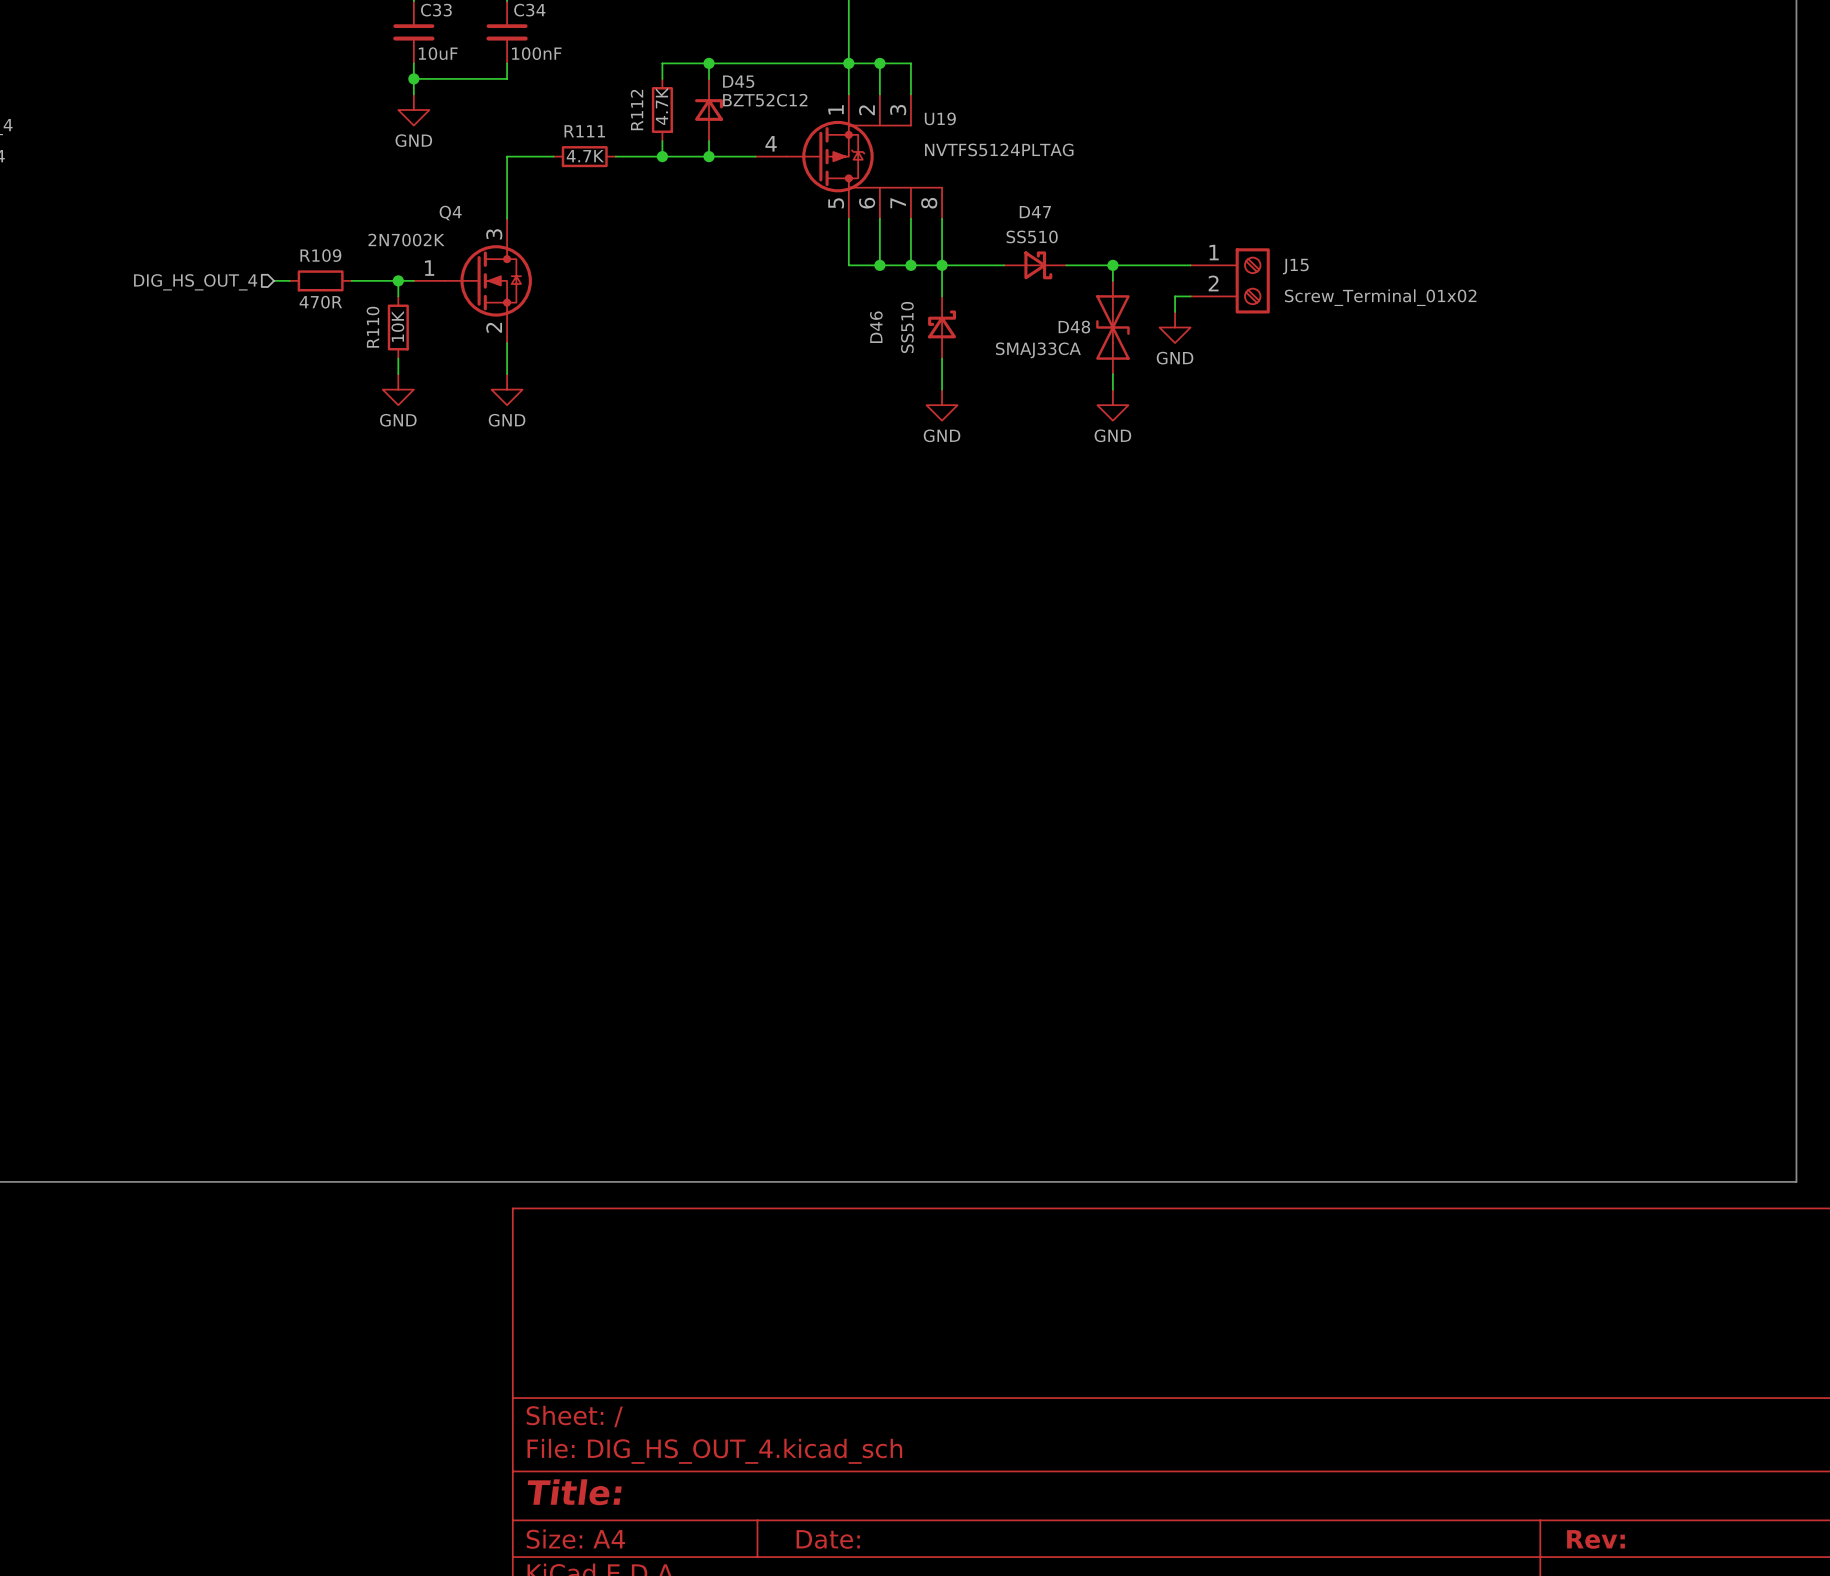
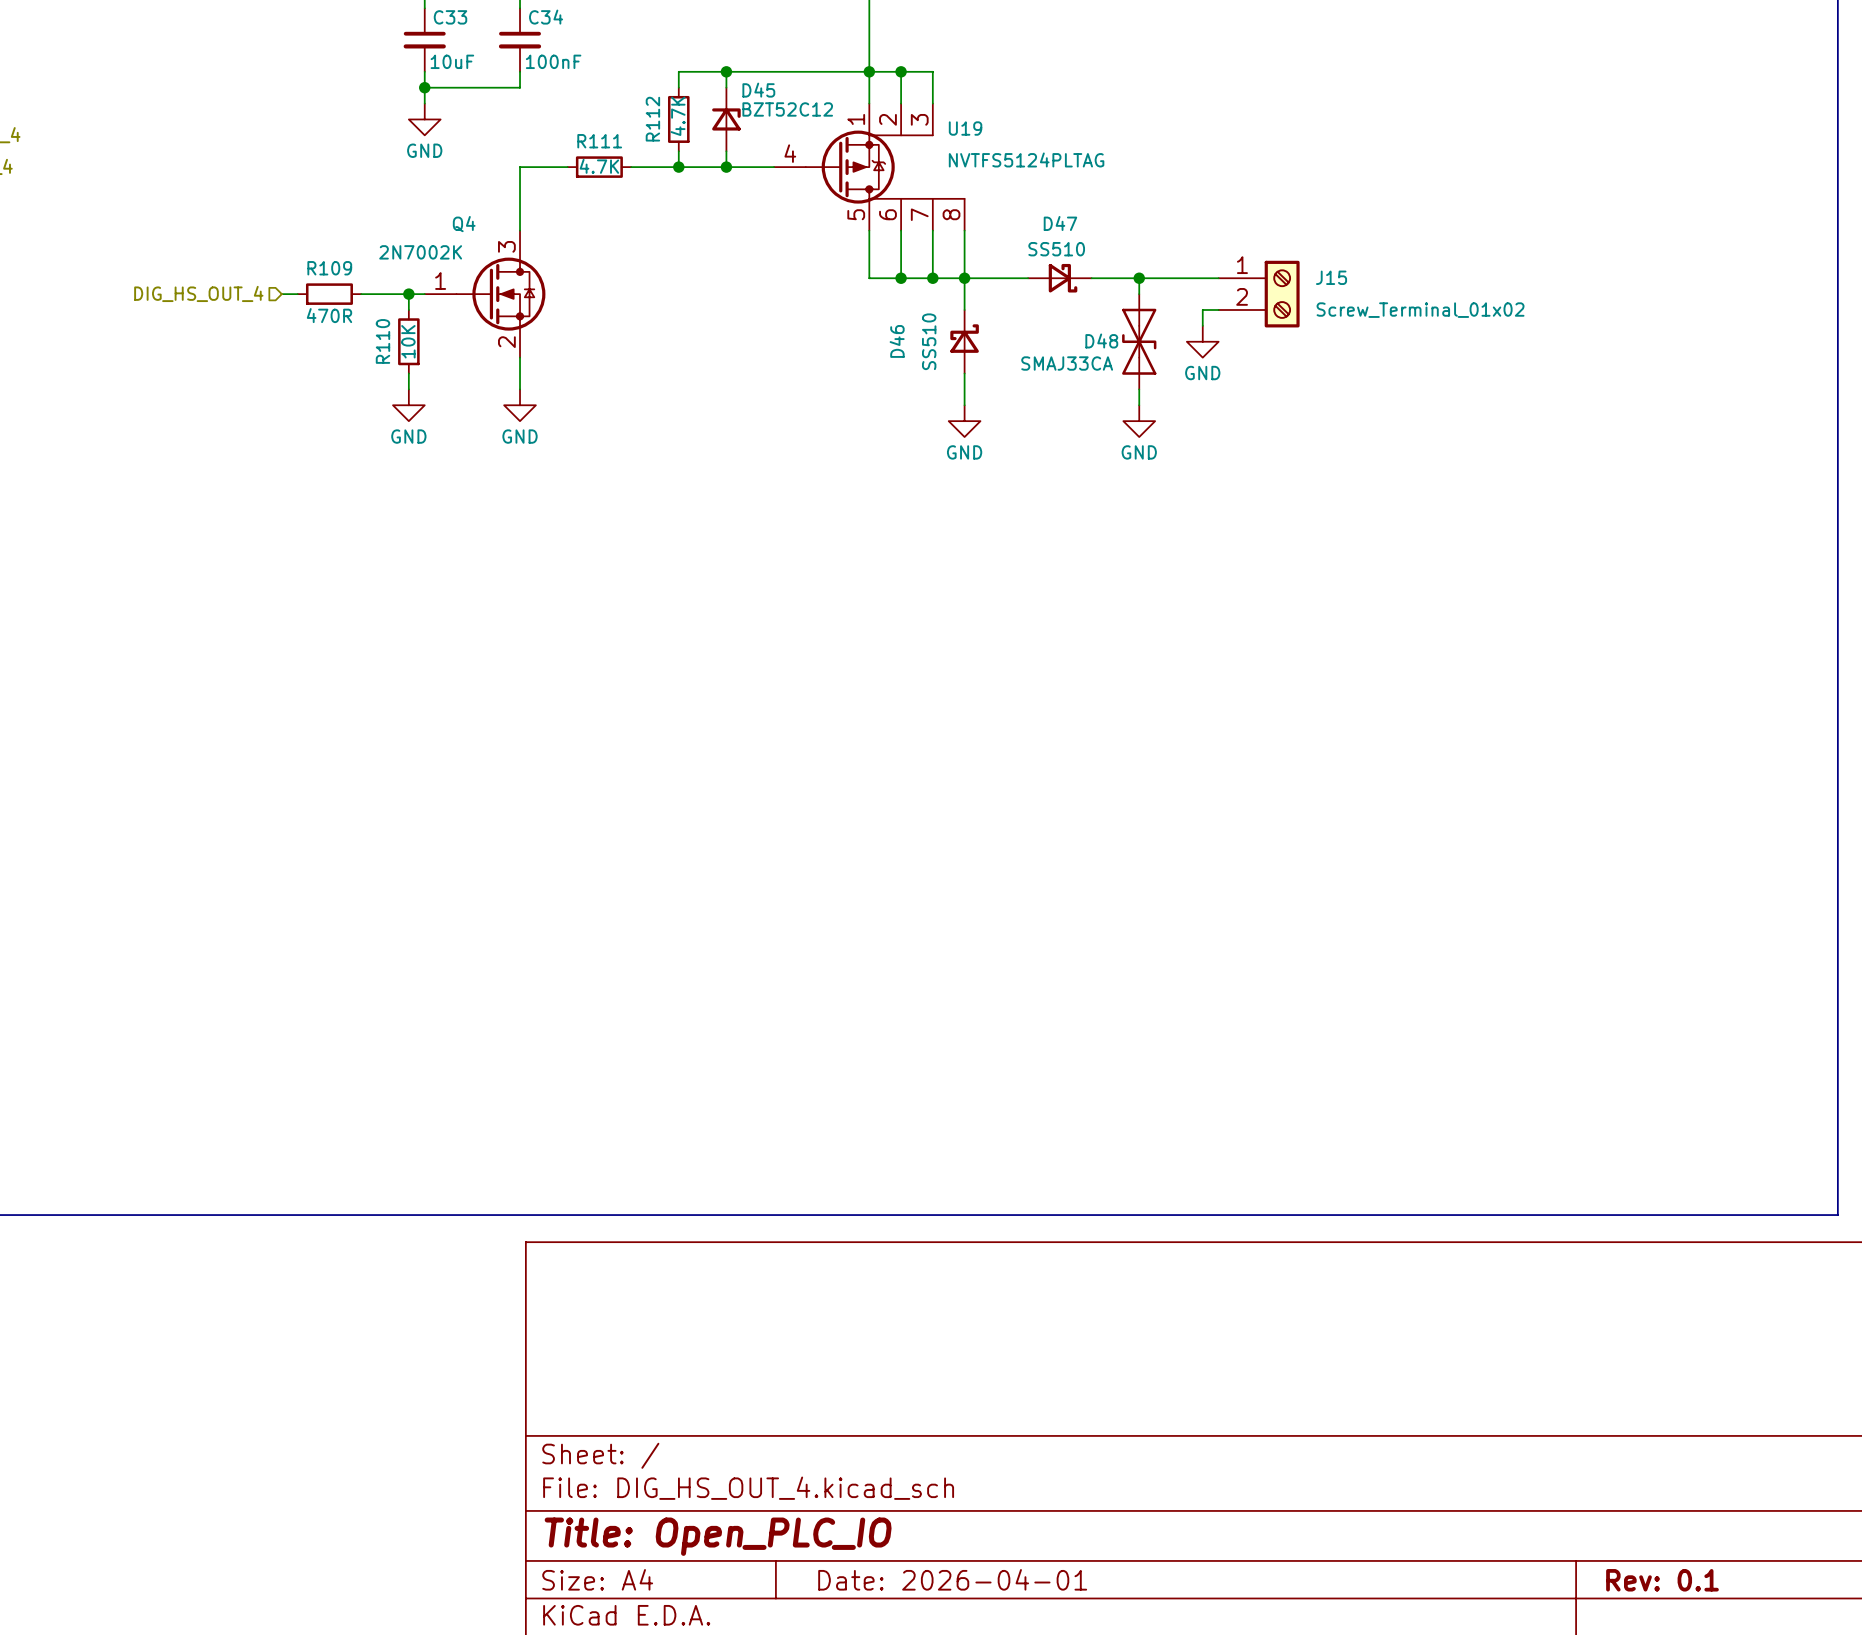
title block: Title: (574, 1492) -> Title: Open_PLC_IO (718, 1536)
title block: Date: (828, 1539) -> Date: 2026-04-01 (952, 1579)
title block: Rev: (1595, 1539) -> Rev: 0.1 (1662, 1580)

